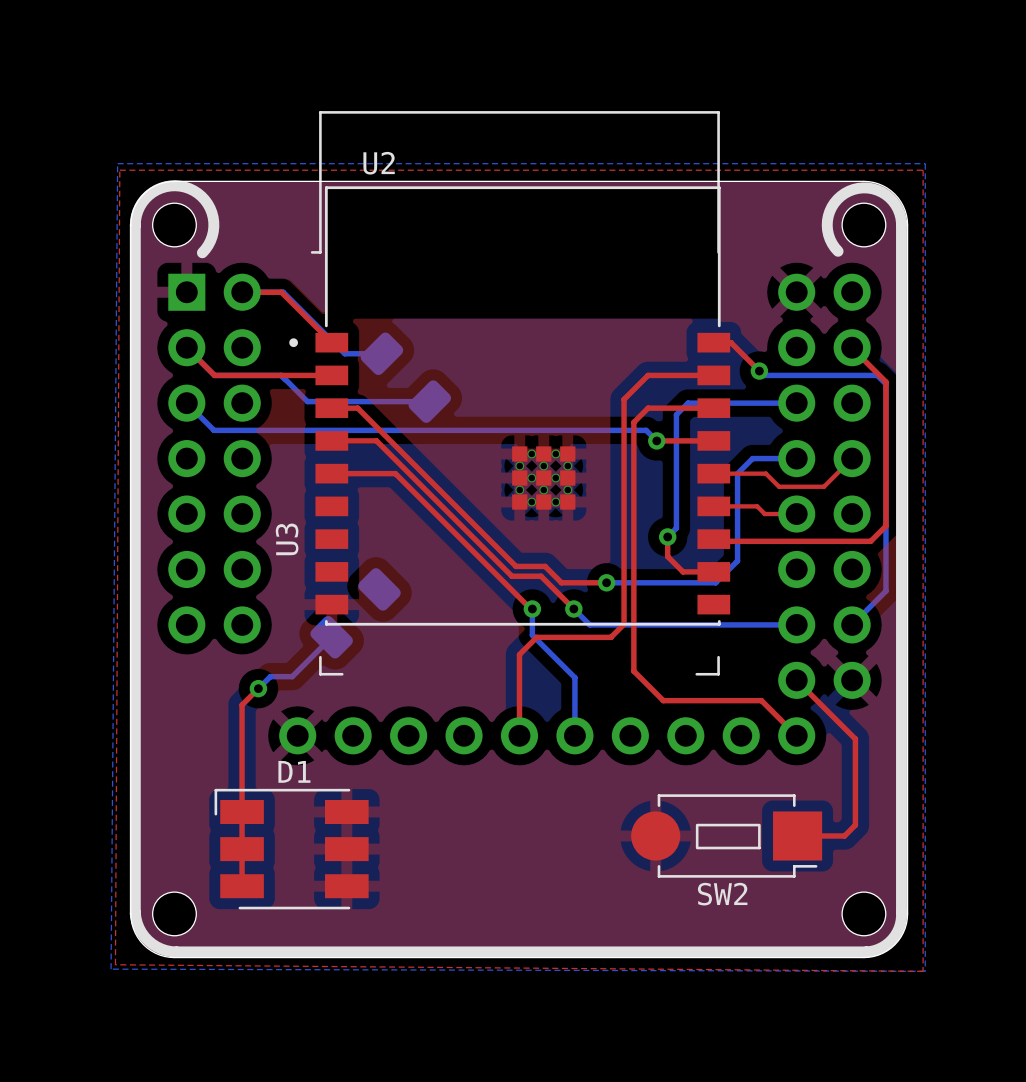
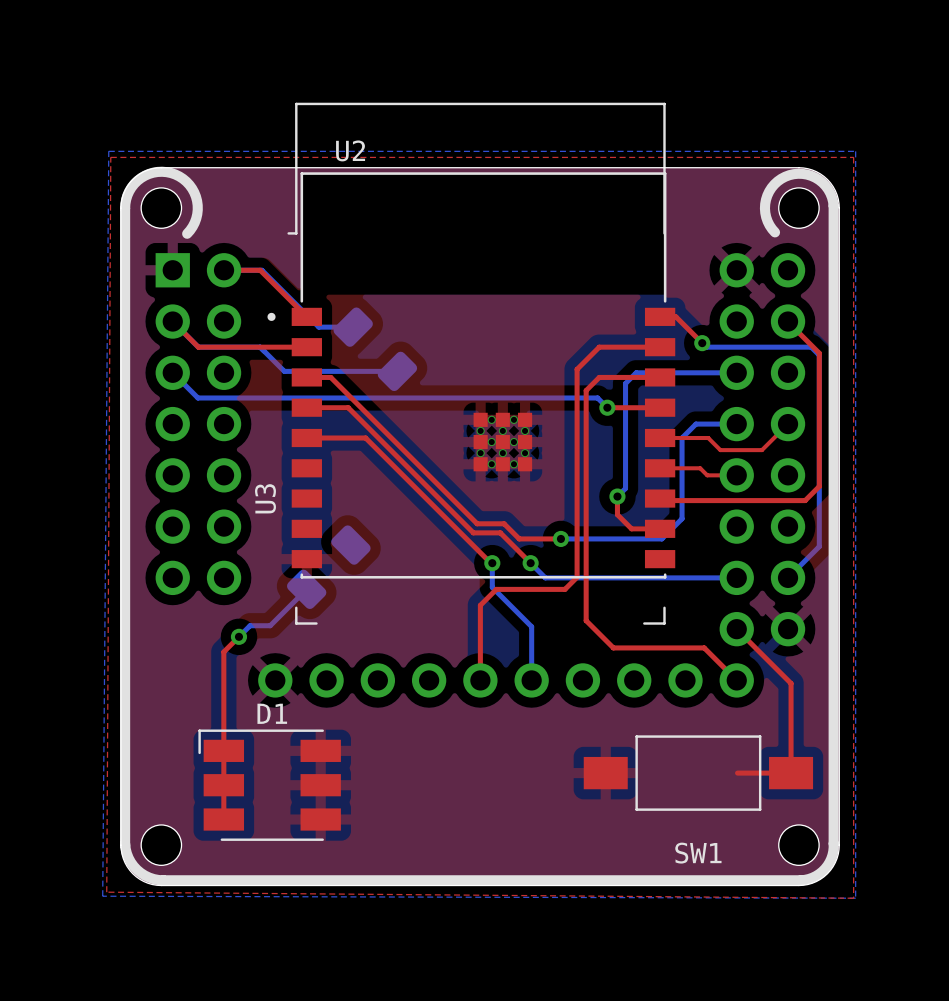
SW2: (726, 836) -> none
SW1: none -> (698, 773)

